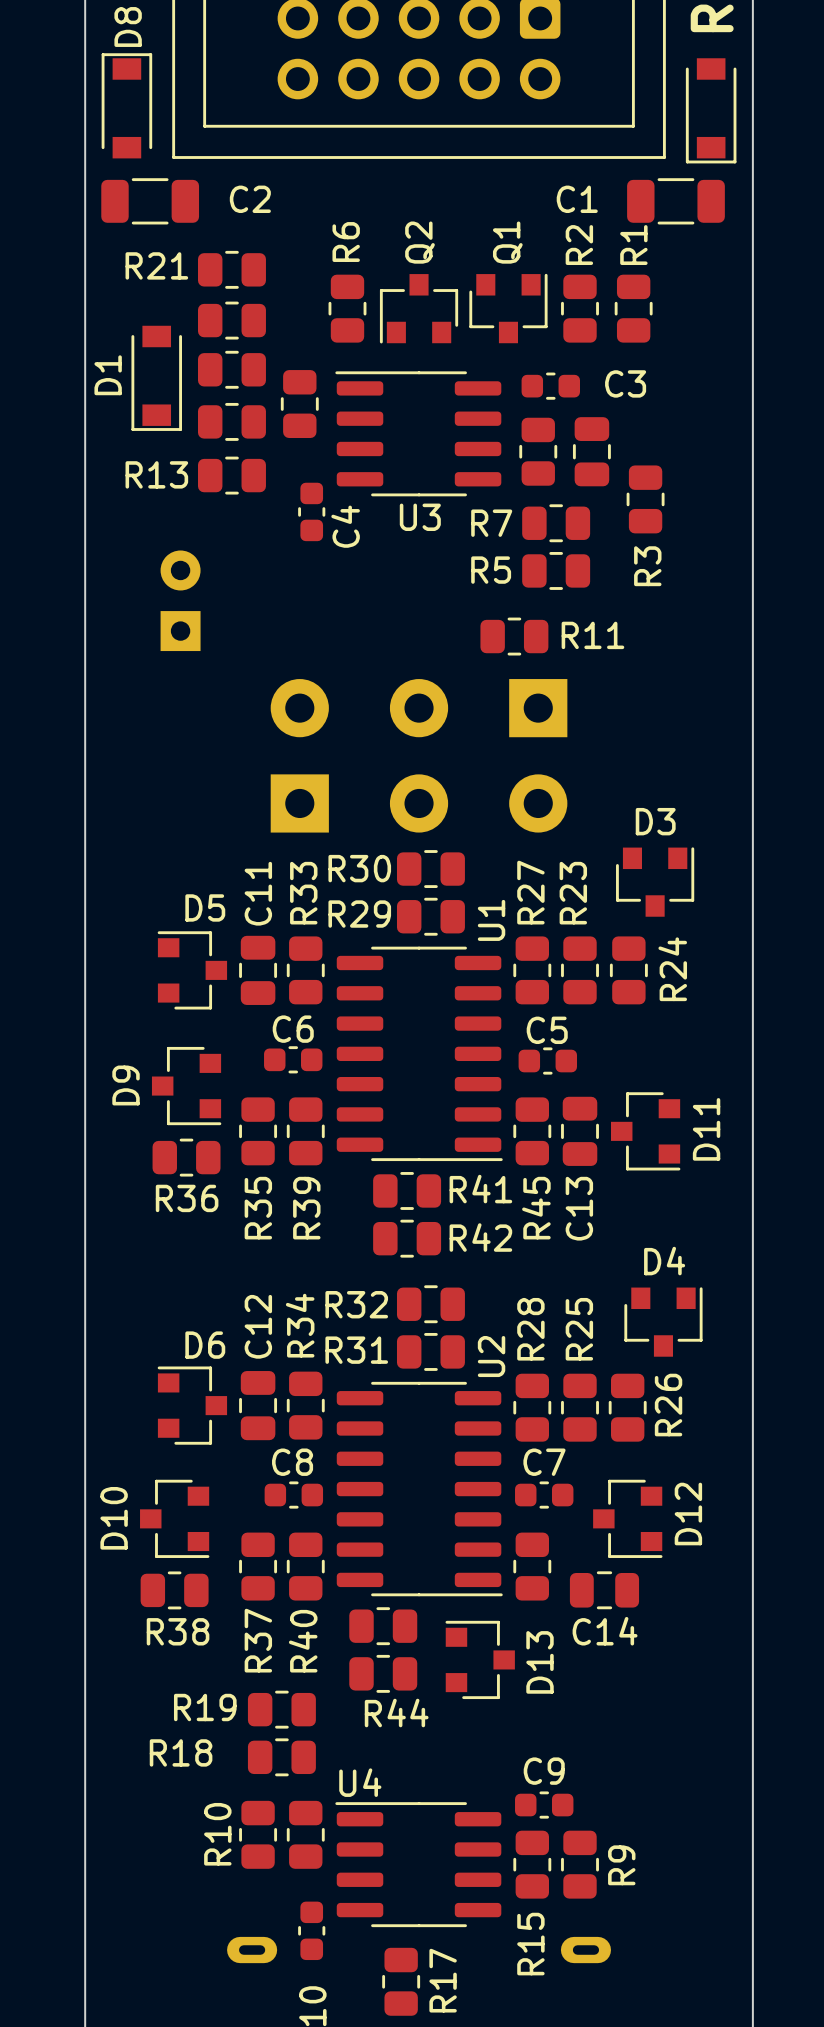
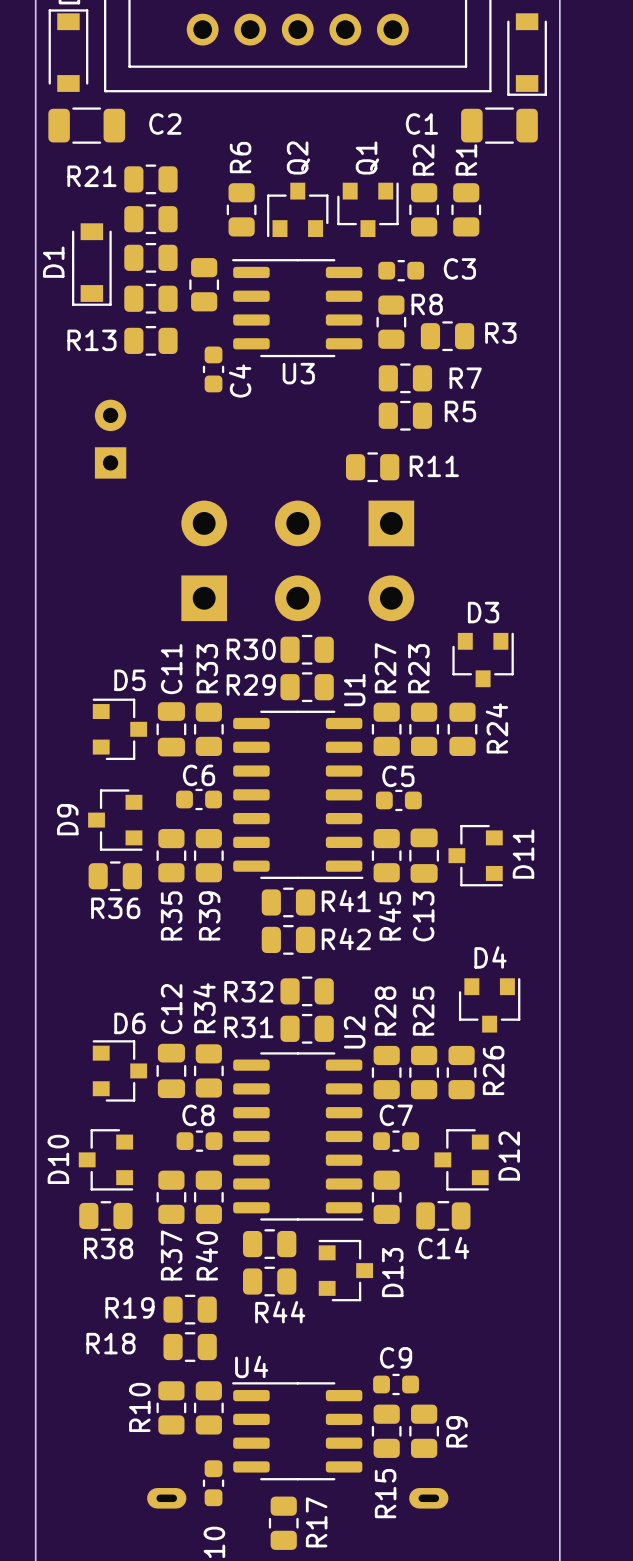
R8 name: none -> R8 (427, 304)
part: (591, 451) -> none
R3 rotation: 0° (645, 499) -> 90° clockwise (447, 336)
R3 position: (645, 499) -> (447, 336)
R7 name position: R7 (491, 523) -> R7 (465, 378)
R3 name position: R3 (647, 566) -> R3 (500, 333)
R5 name position: R5 (491, 570) -> R5 (460, 411)

